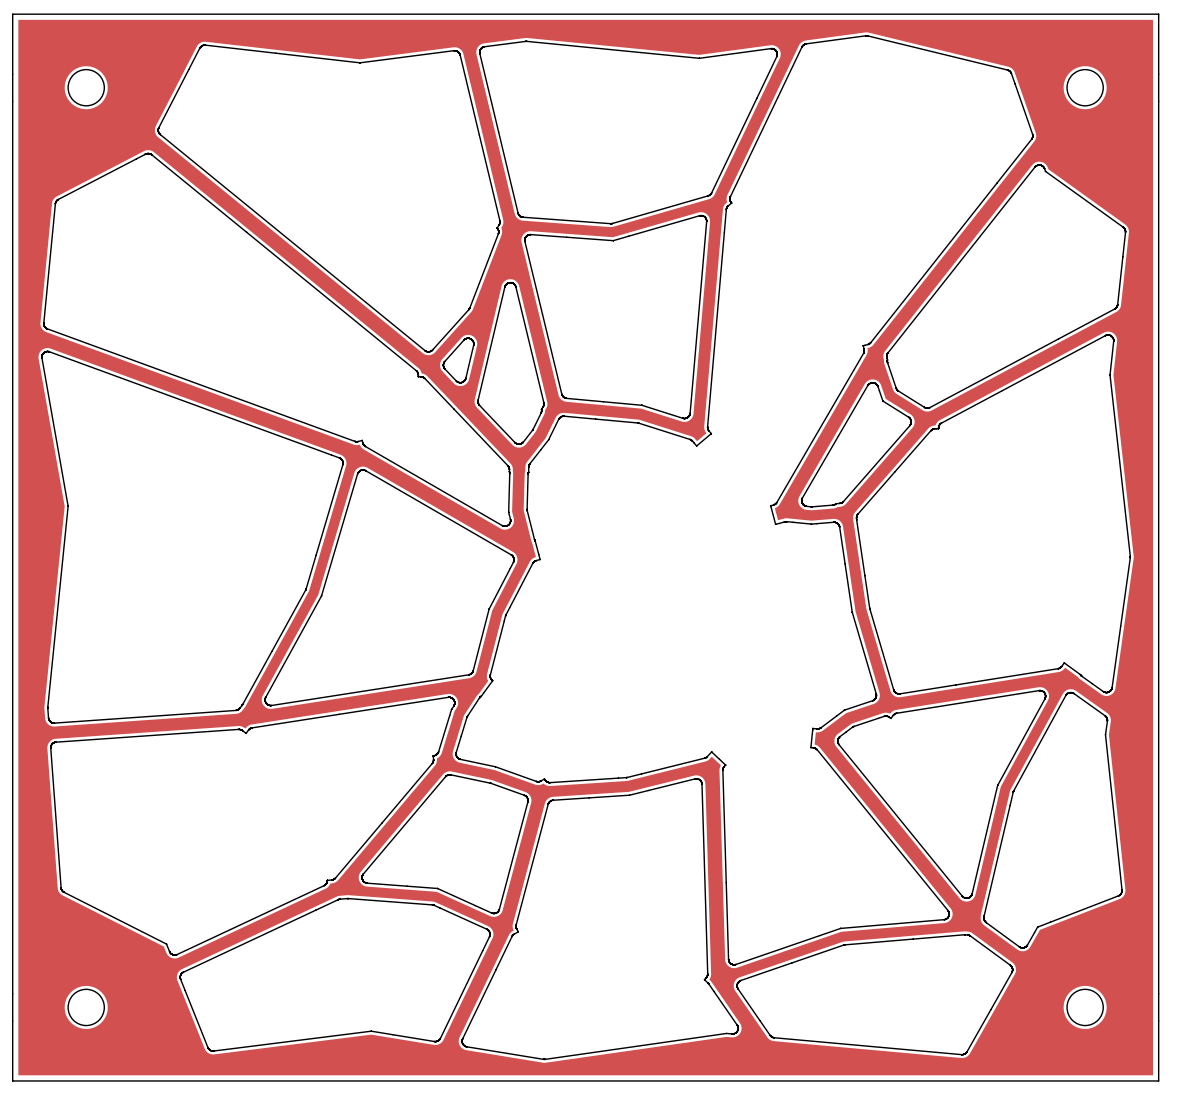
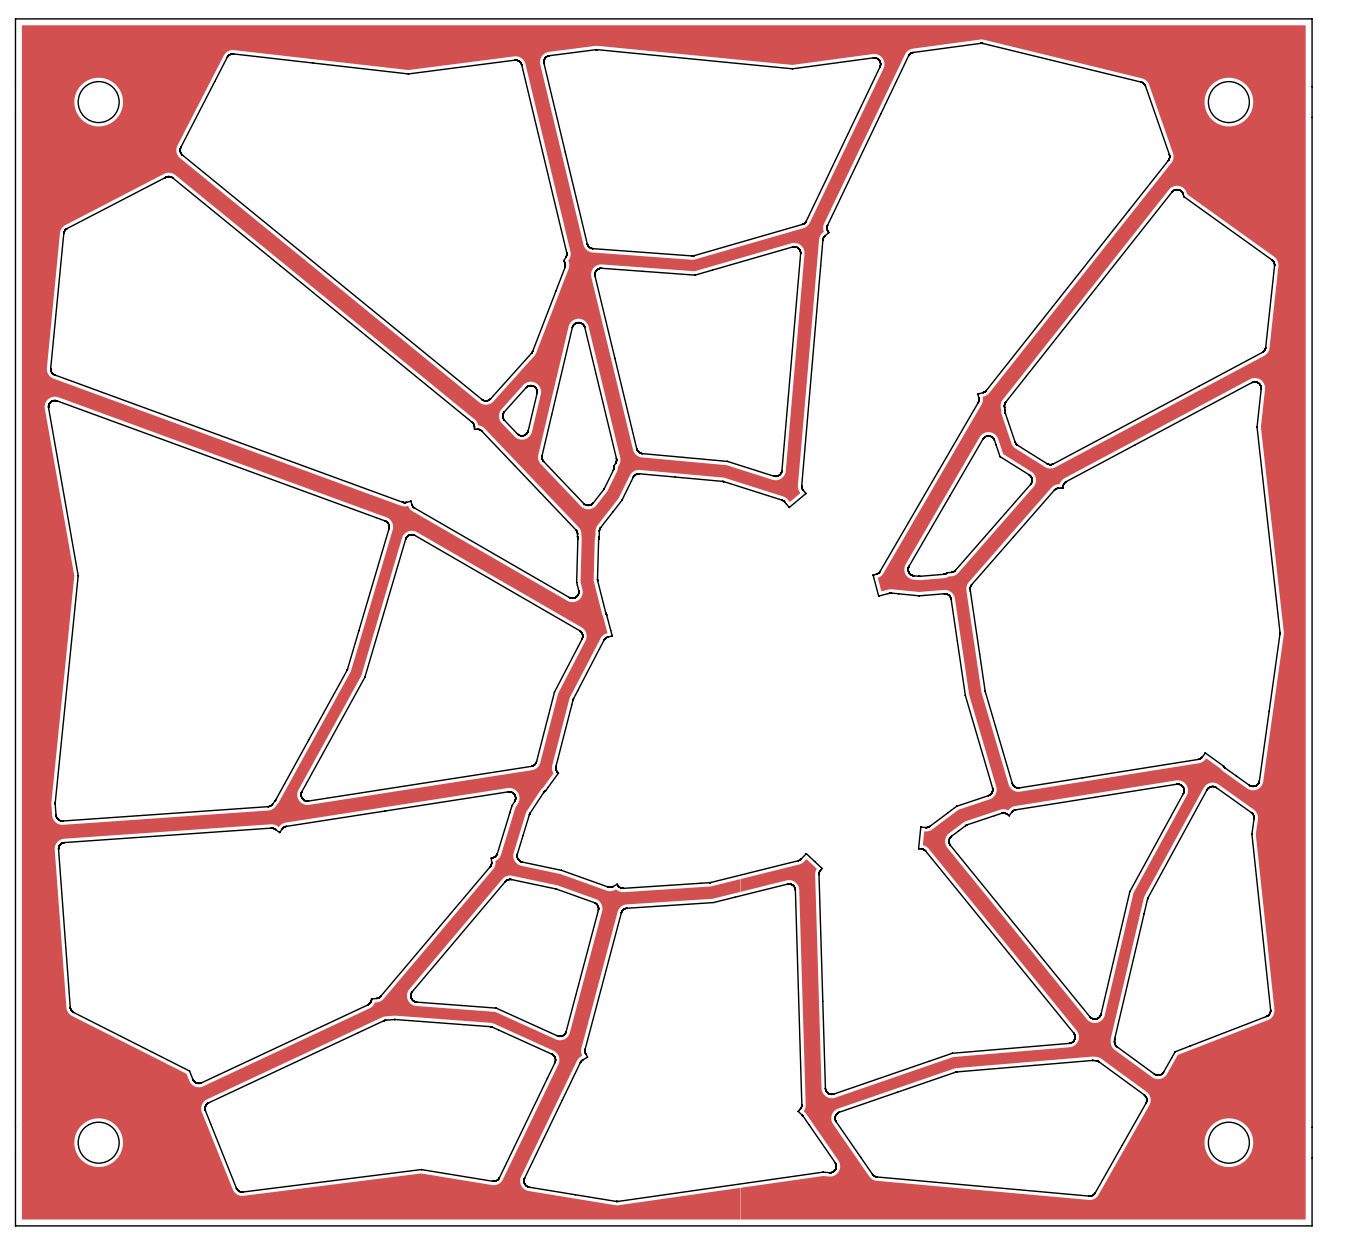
drawing shape: [653, 756, 849, 1076] -> [740, 859, 980, 1220]

